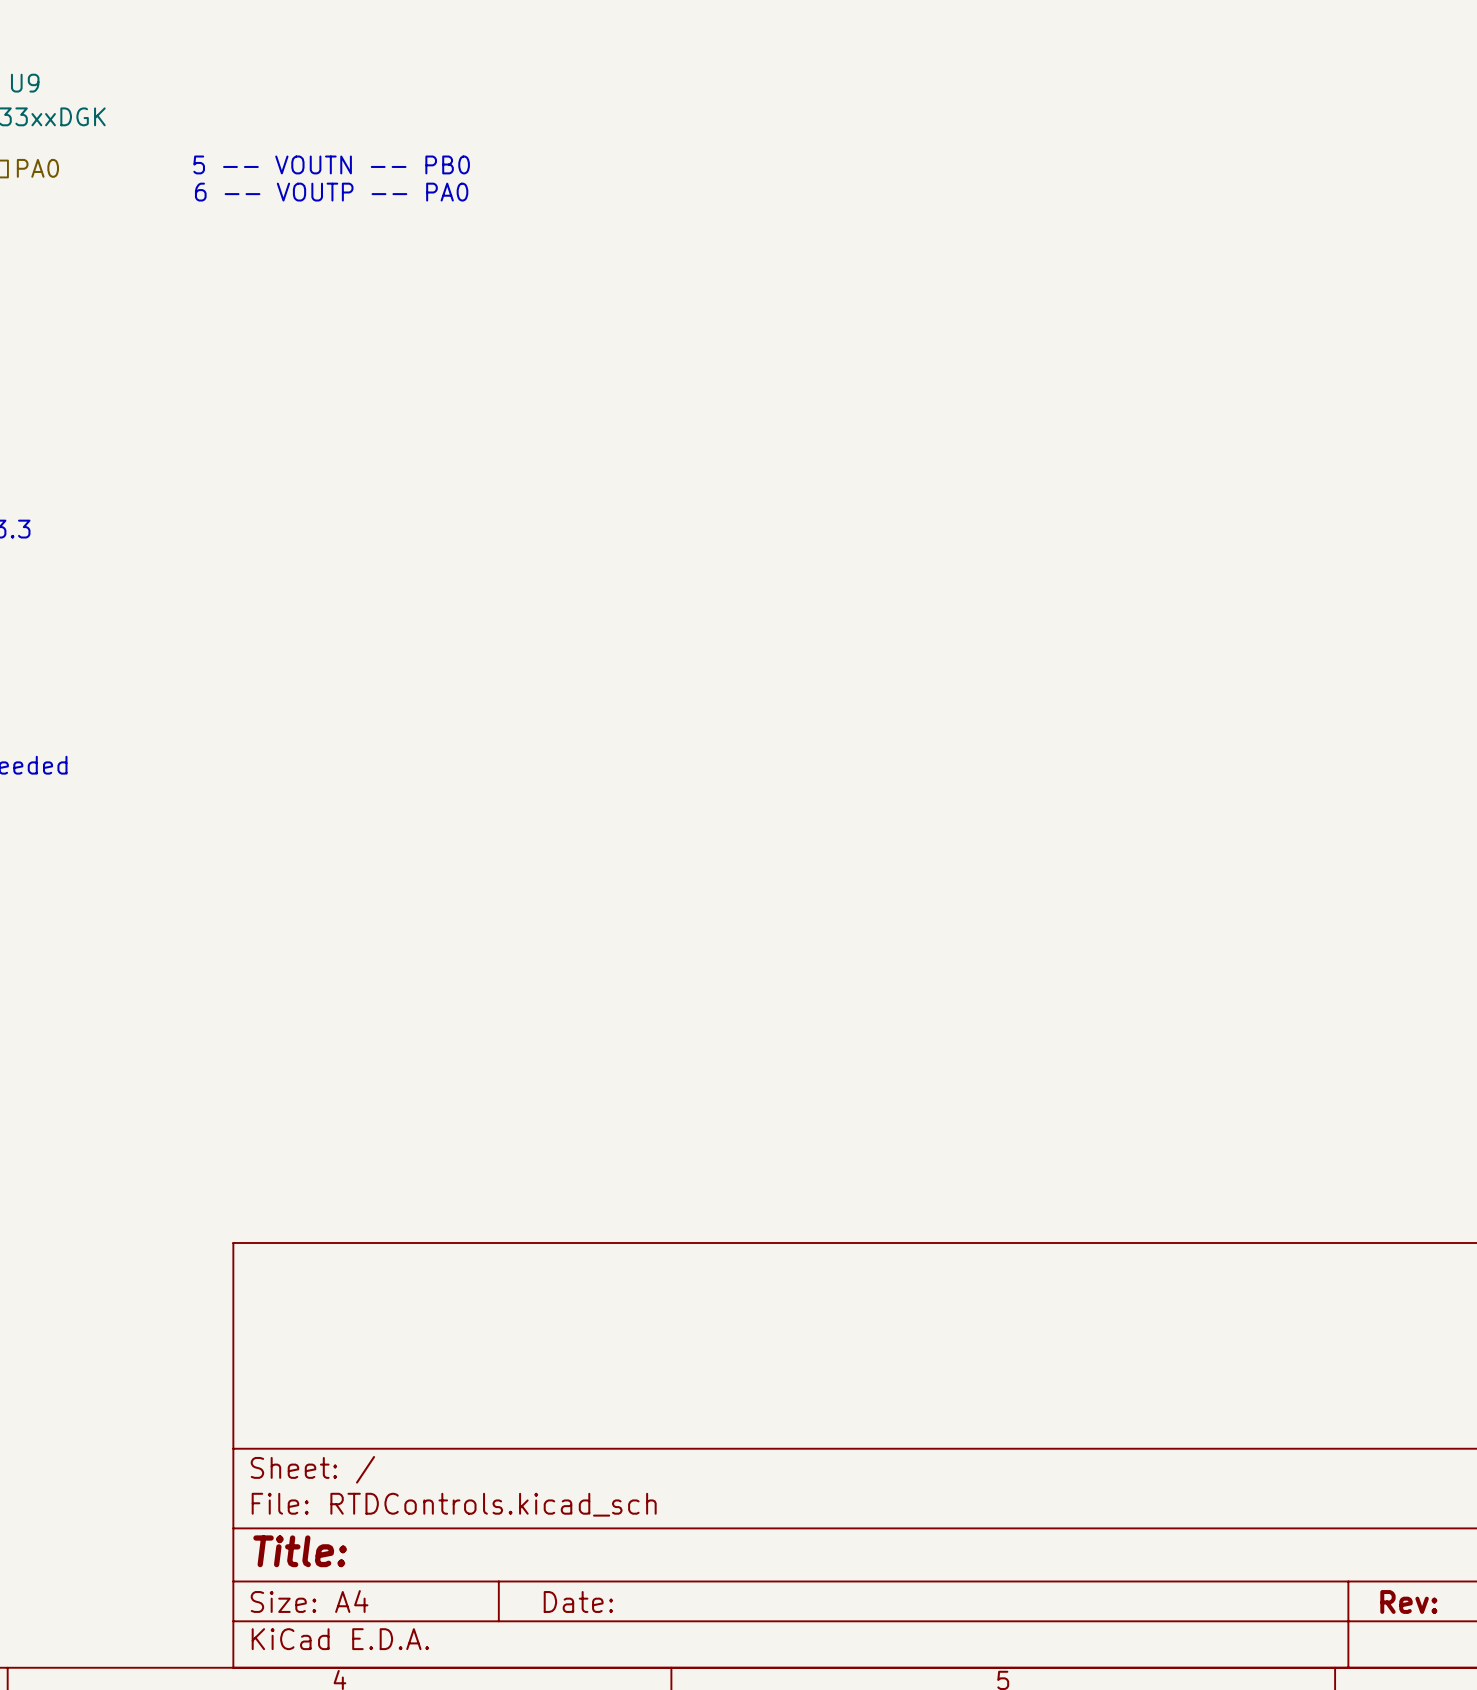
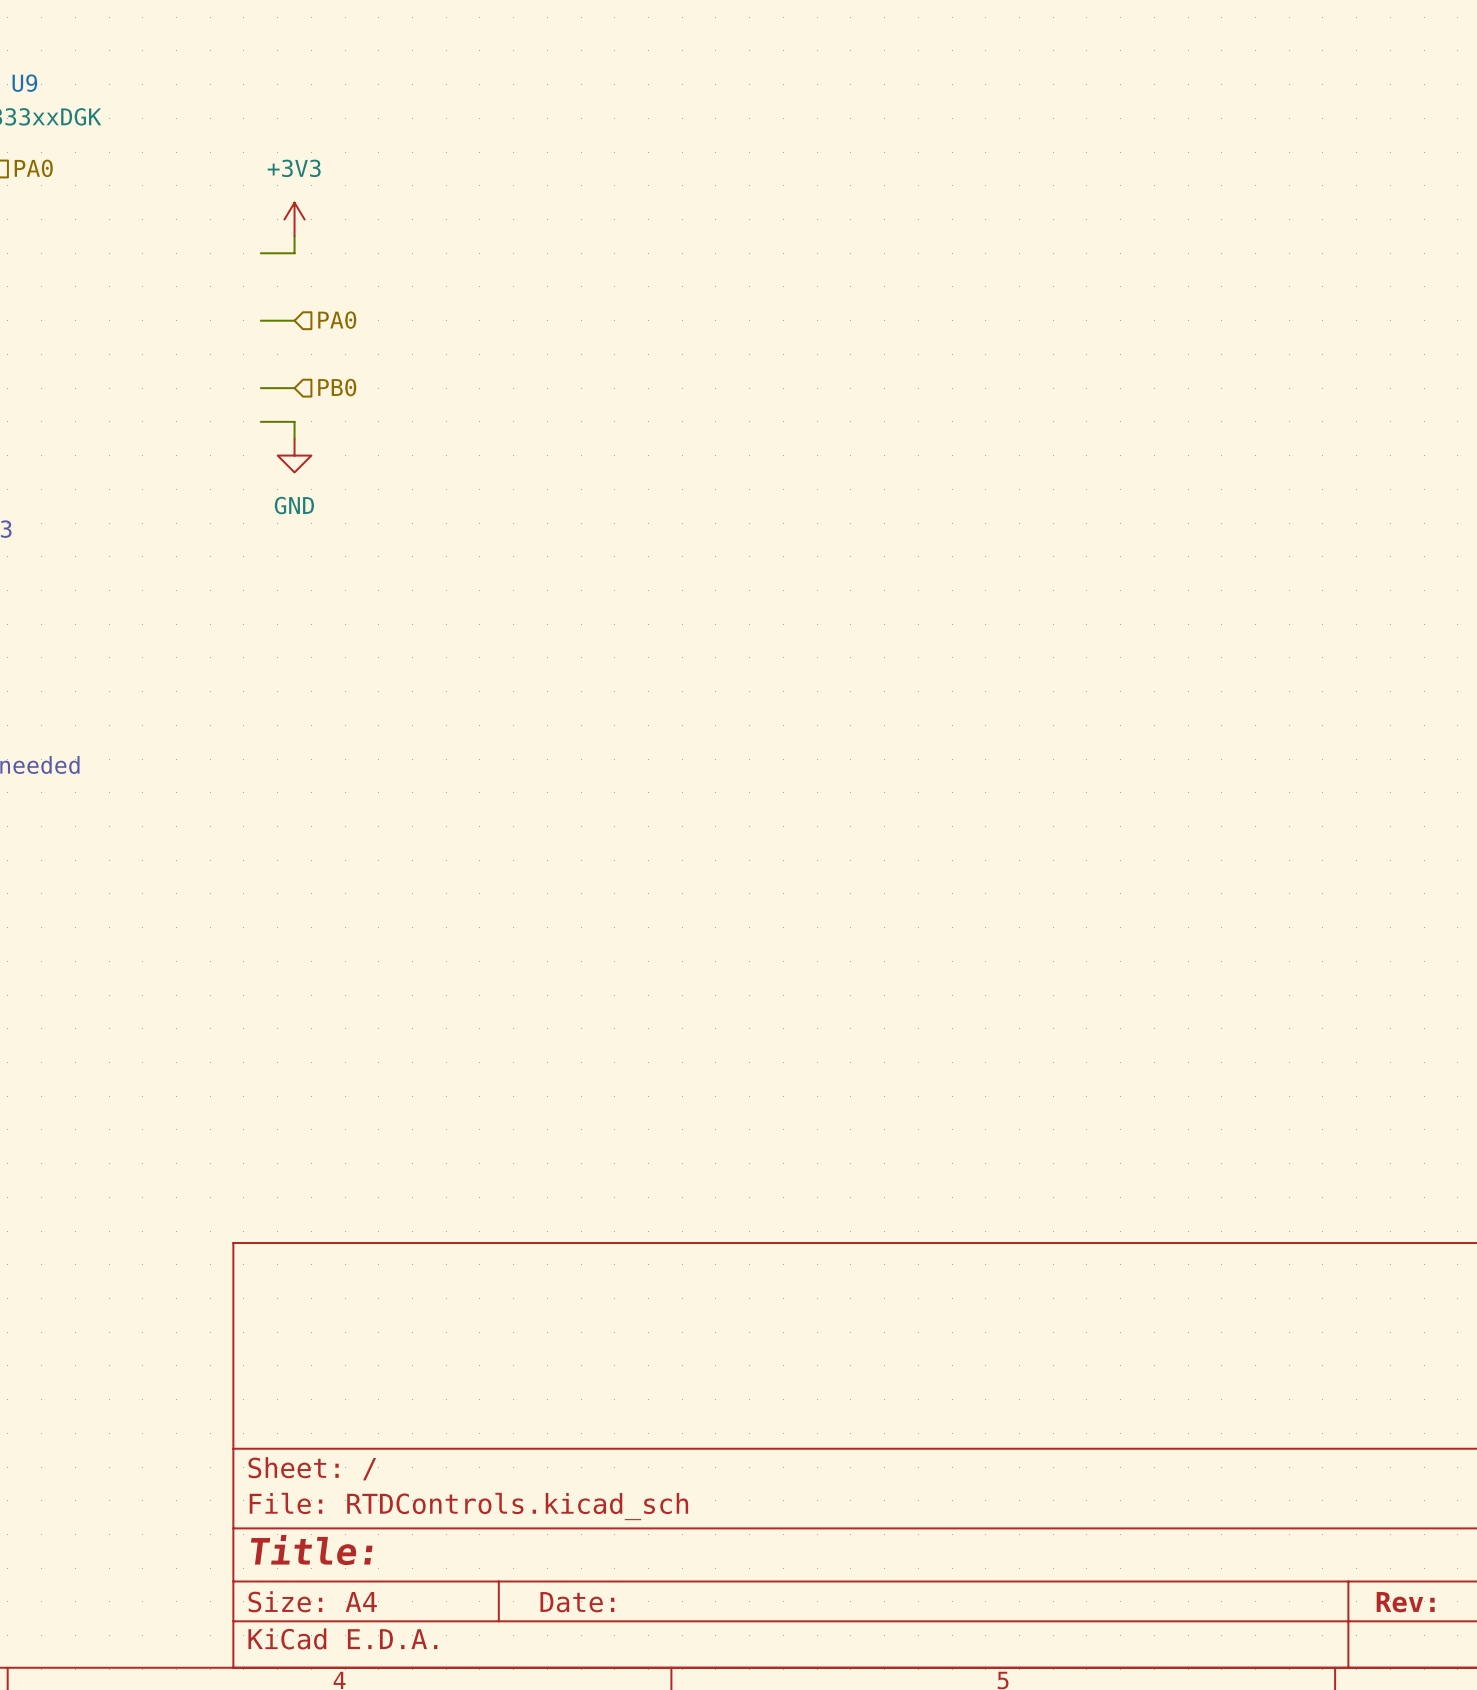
text: 5 -- VOUTN -- PB0 (331, 164) -> none
text: 6 -- VOUTP -- PA0 (331, 192) -> none
power symbol: none -> +3V3 (294, 219)
wire: none -> (294, 236) (294, 253) (260, 253)
wire: none -> (260, 320) (294, 320)
hierarchical label: none -> PA0 (337, 320)
hierarchical label: none -> PB0 (337, 387)
wire: none -> (260, 388) (294, 388)
wire: none -> (260, 421) (294, 421) (294, 438)
power symbol: none -> GND (294, 455)

